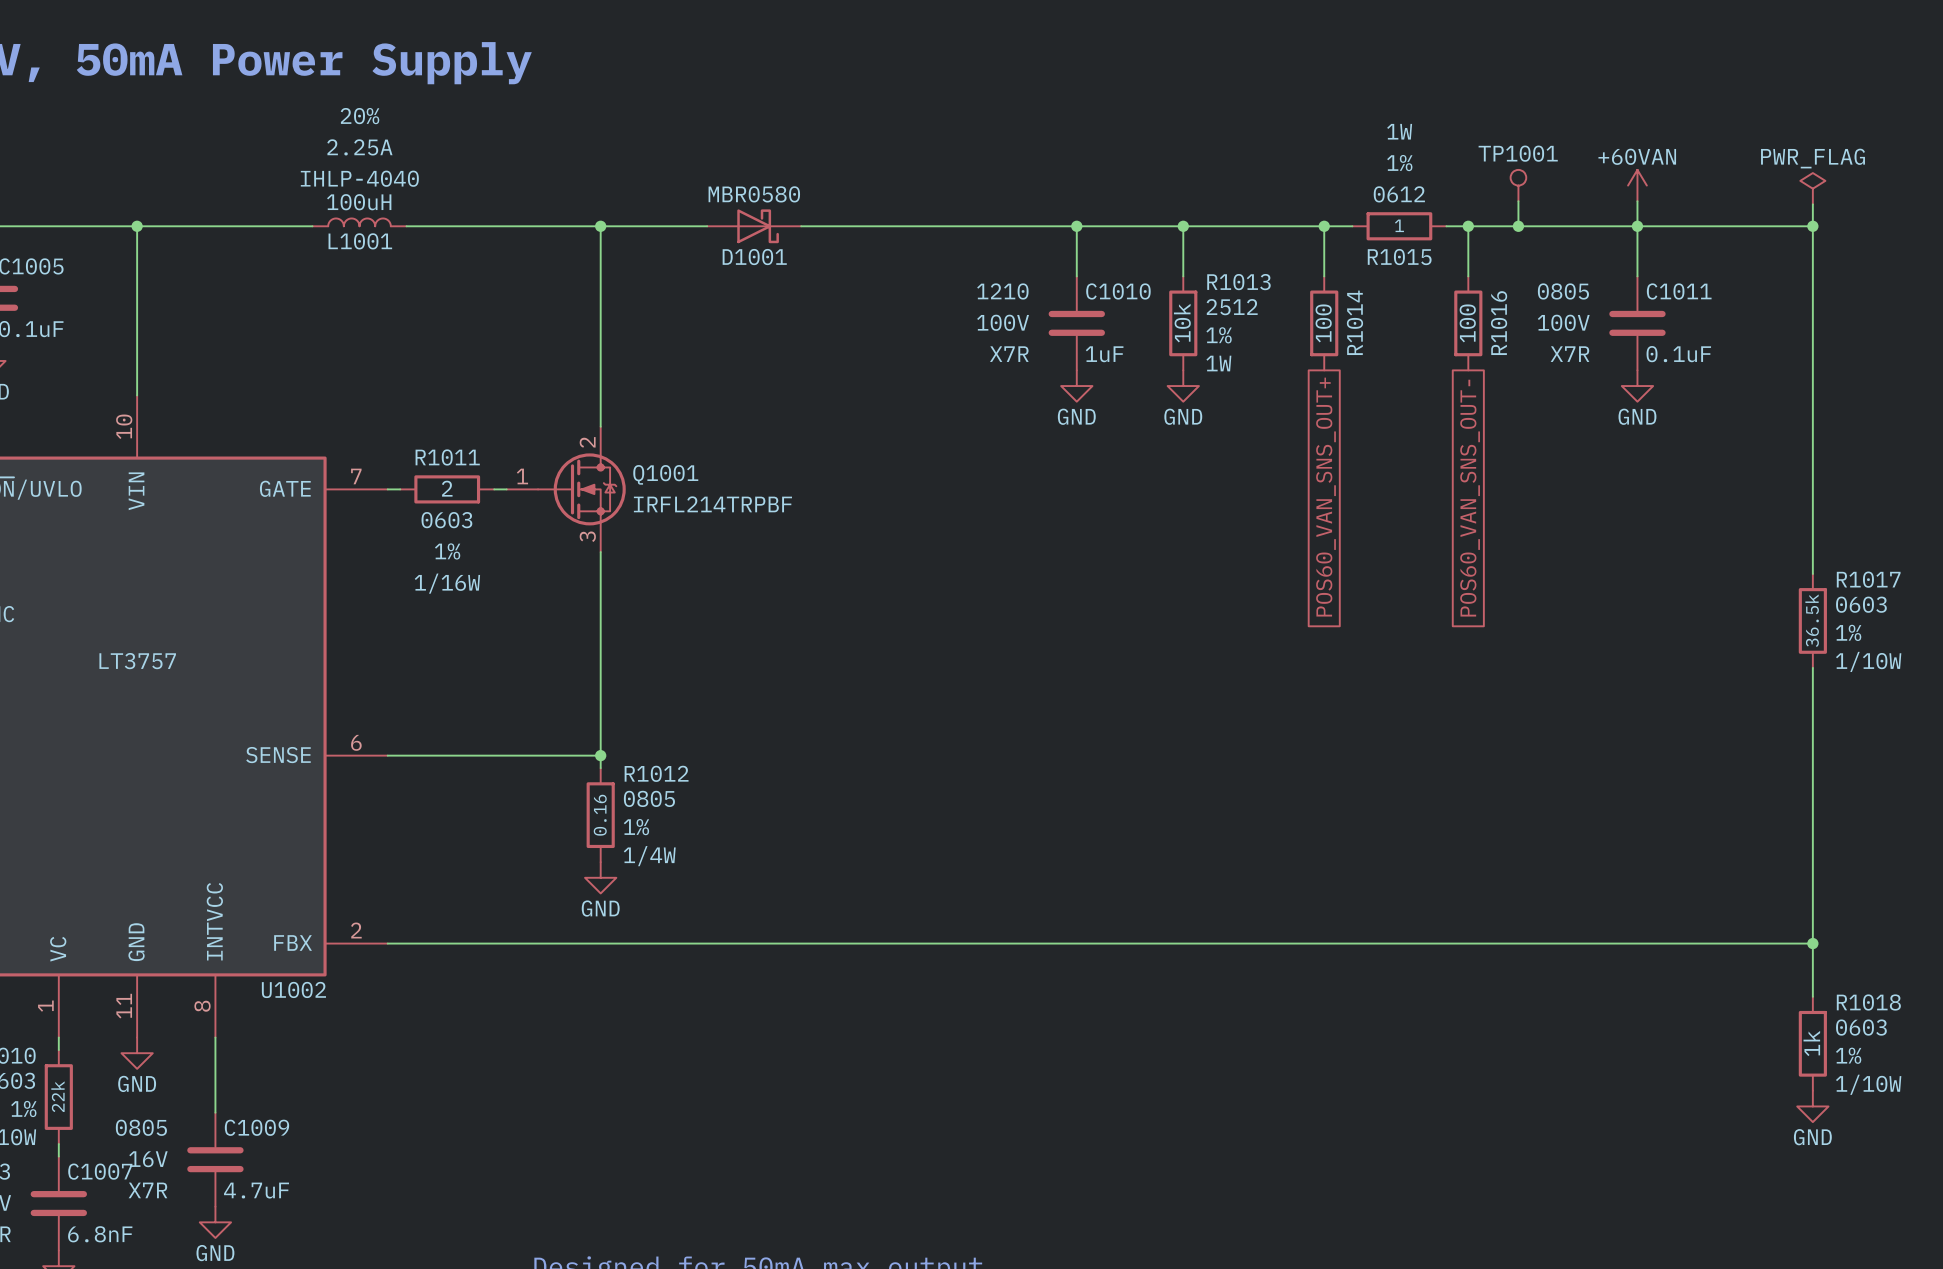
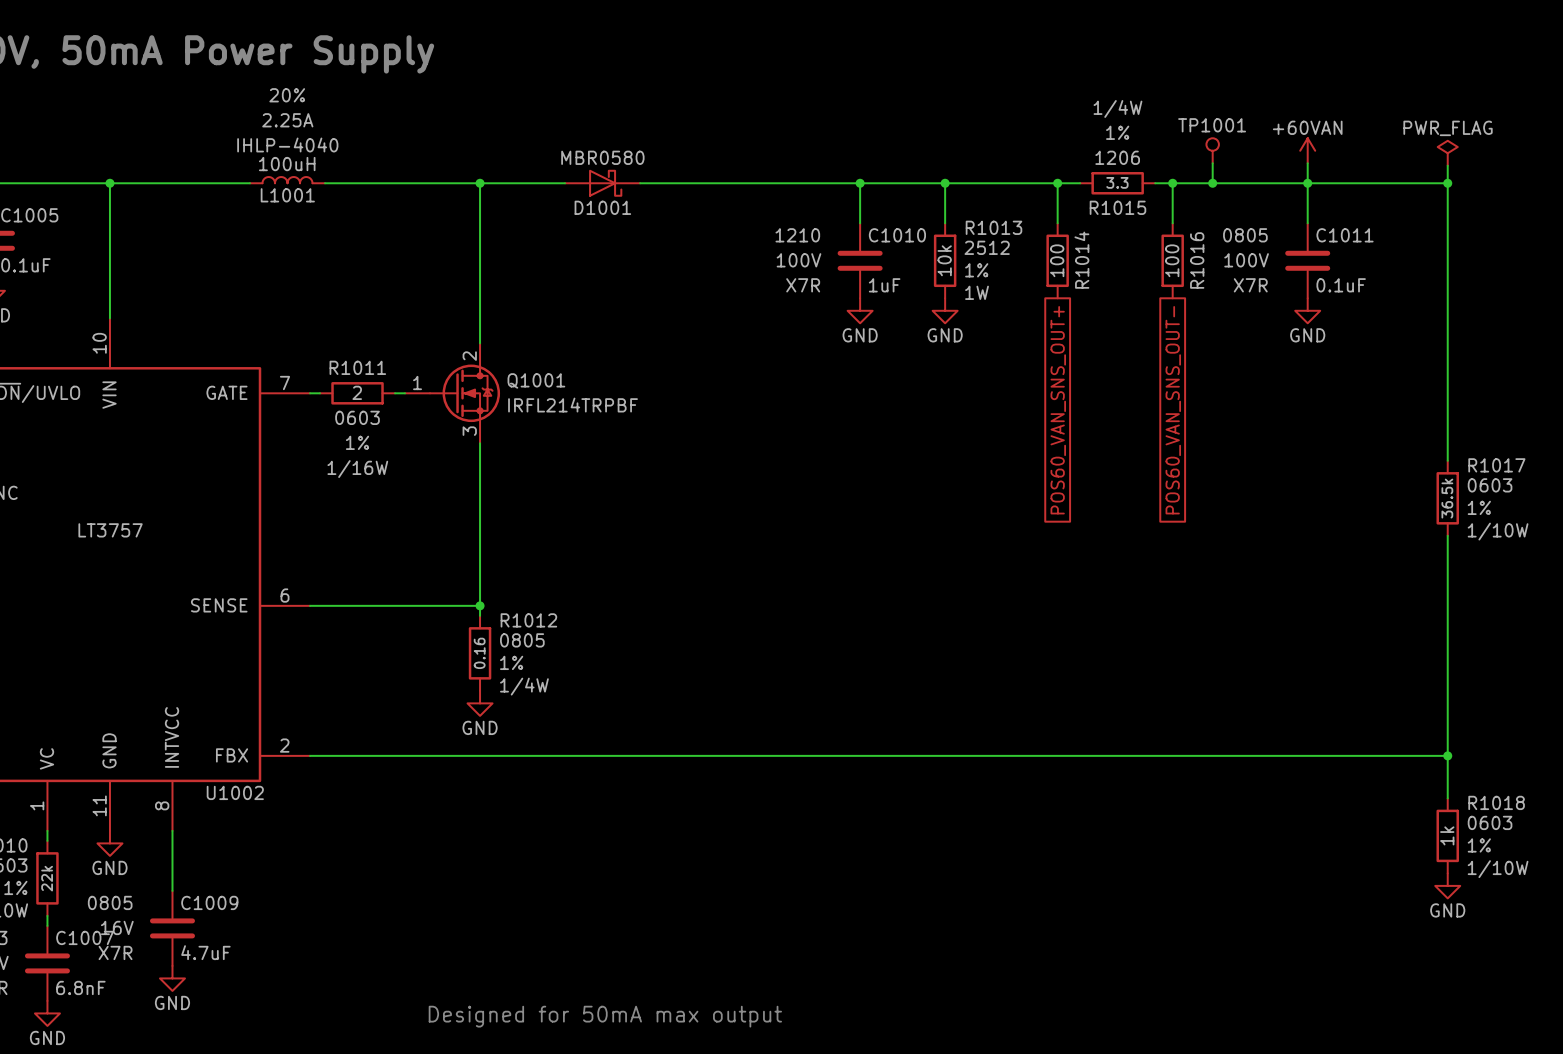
R1015 text: 1W (1399, 131) -> 1/4W (1117, 108)
R1015 text: 0612 (1399, 194) -> 1206 (1117, 157)
R1015 value: 1 (1399, 225) -> 3.3 (1117, 182)

